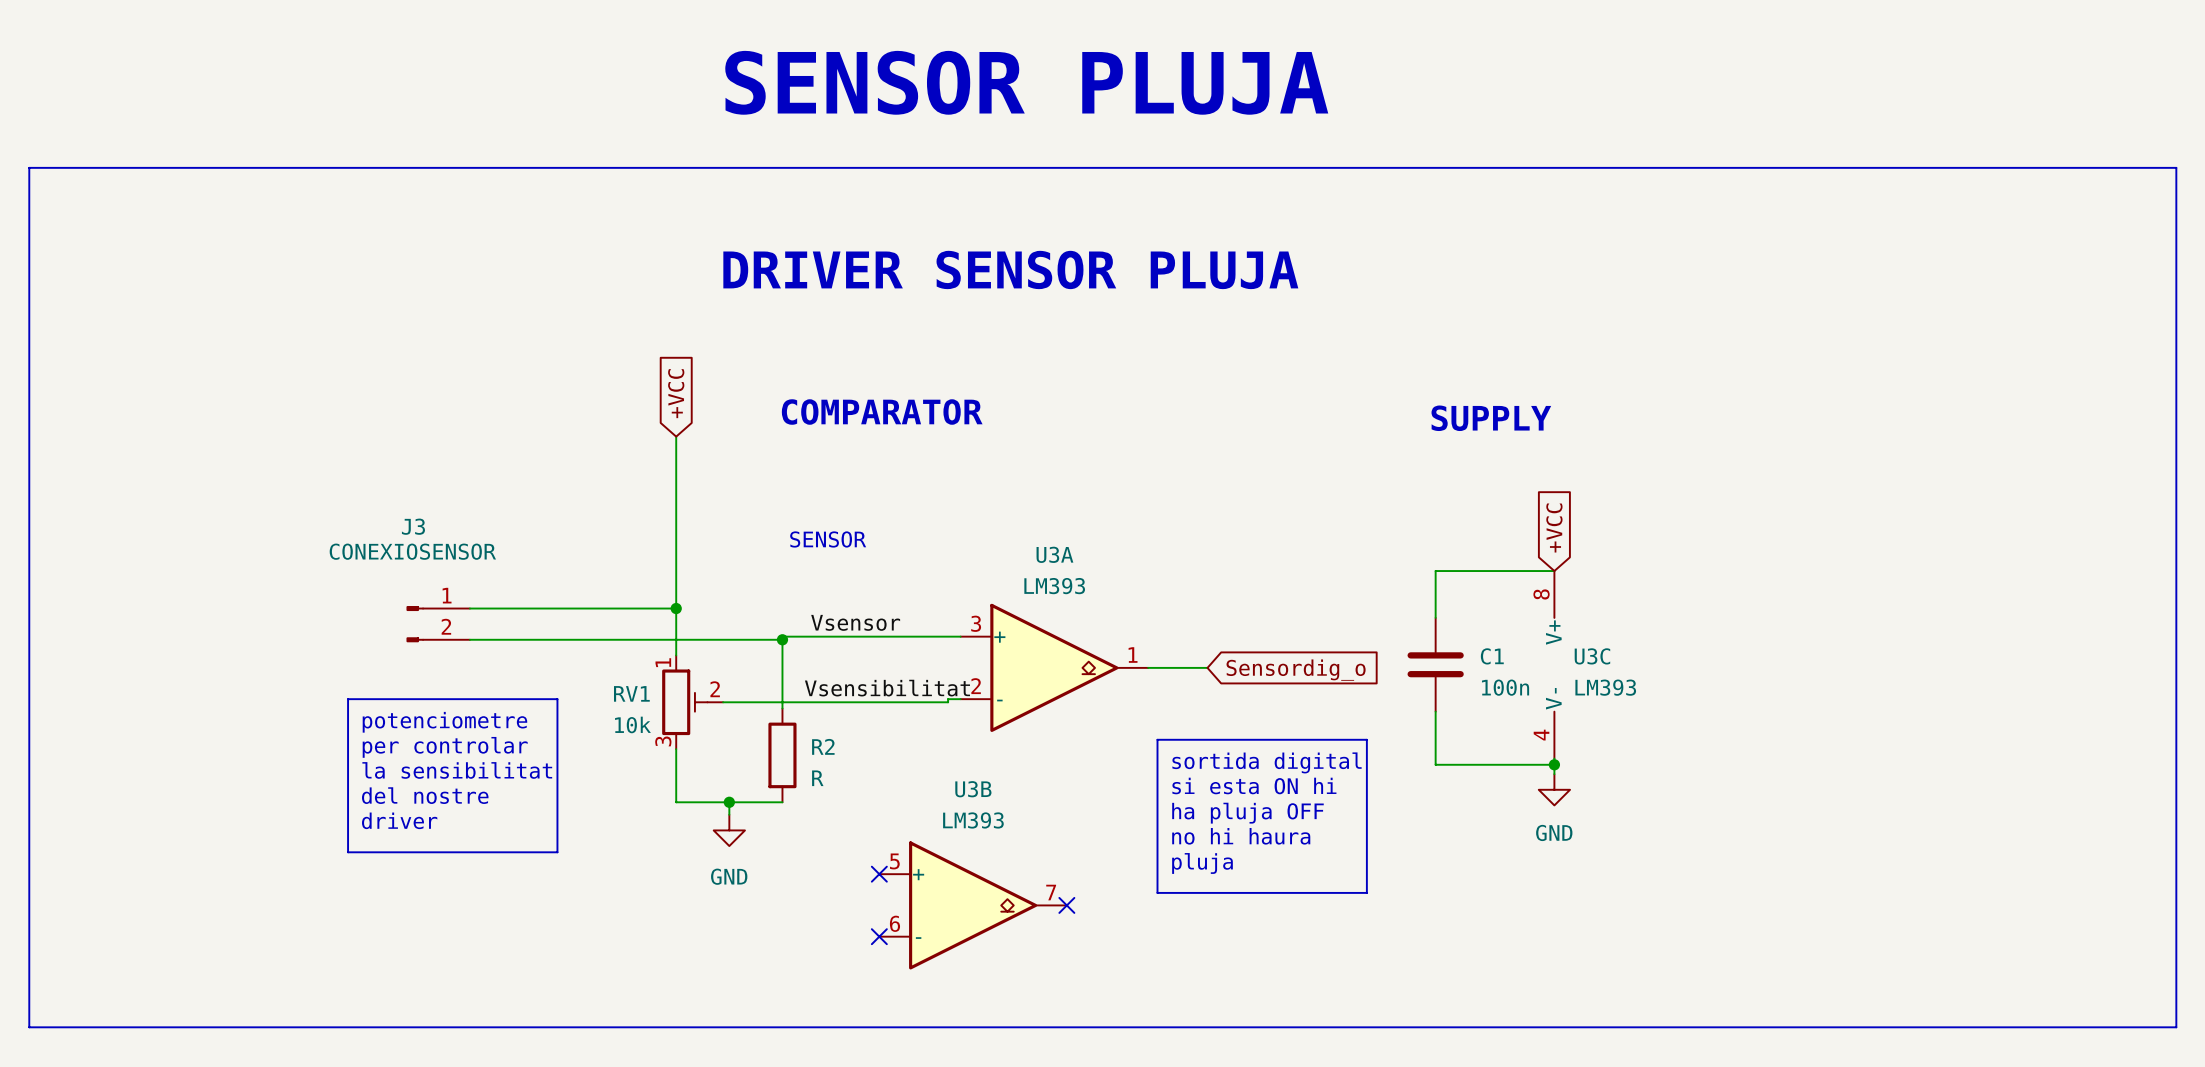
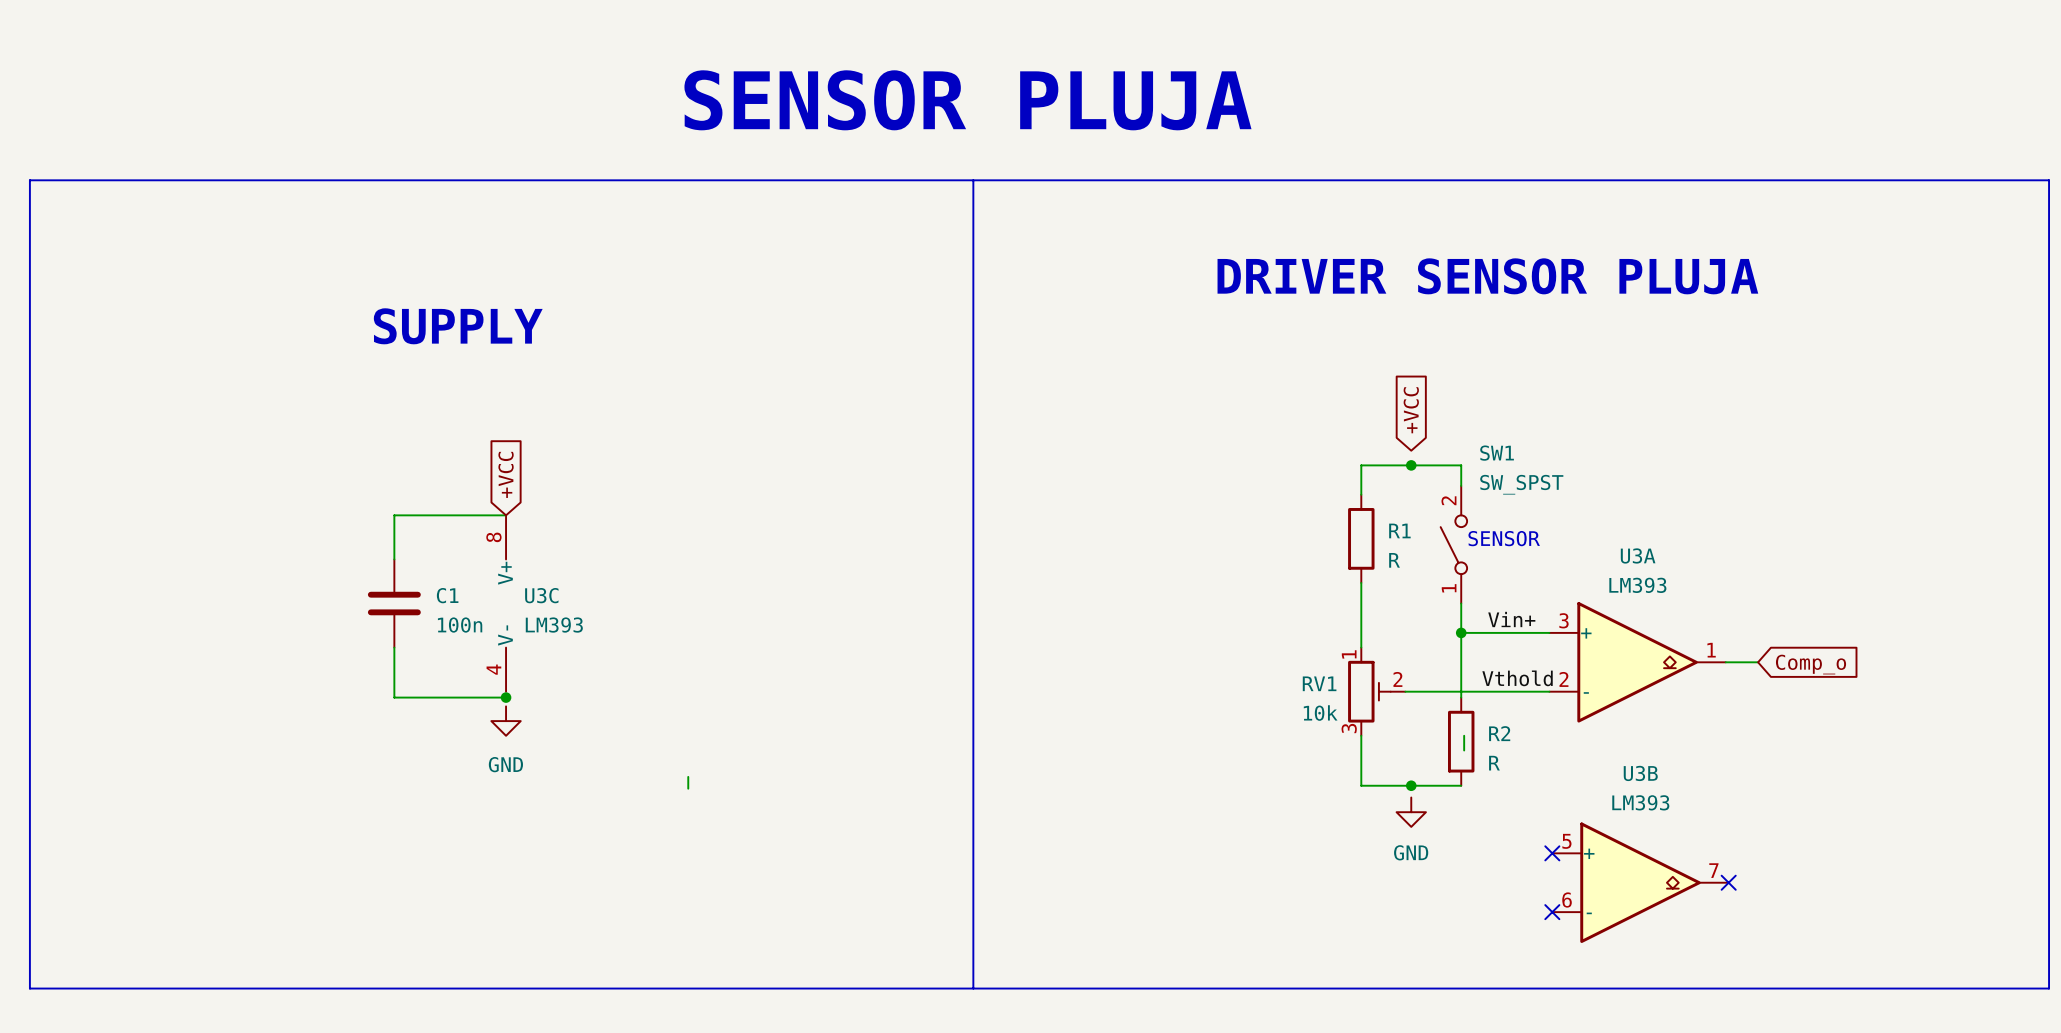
line: none -> (973, 180) (973, 988)
text: DRIVER SENSOR PLUJA (1010, 269) -> none
text: none -> DRIVER SENSOR PLUJA (1487, 276)
text: none -> SUPPLY (458, 326)
global label position: +VCC (676, 393) -> +VCC (506, 474)
text: COMPARATOR (882, 412) -> none
text: SUPPLY (1491, 418) -> none
wire: (676, 436) (676, 655) -> none
junction: none -> (1411, 465)
wire: none -> (1461, 485) (1461, 465) (1361, 465) (1361, 494)
wire: none -> (506, 515) (394, 515) (394, 559)
global label position: +VCC (1554, 528) -> +VCC (1411, 410)
text: SENSOR (828, 539) -> none
text: none -> SENSOR (1504, 538)
R1: none -> R (1361, 538)
SW1: none -> SW_SPST (1453, 544)
wire: (1554, 571) (1435, 571) (1435, 617) -> none
wire: none -> (1361, 582) (1361, 647)
wire: (469, 608) (676, 608) -> none
junction: (676, 608) -> none
wire: none -> (1461, 603) (1461, 697)
label: Vsensor (855, 622) -> none
J3: CONEXIOSENSOR (438, 624) -> none
label: none -> Vin+ (1511, 619)
wire: (960, 636) (782, 636) (782, 708) -> none
wire: (469, 639) (782, 639) -> none
junction: (782, 639) -> none
wire: none -> (1461, 632) (1549, 632)
junction: none -> (1461, 632)
wire: none -> (394, 647) (394, 697) (506, 697)
C1 position: (1435, 664) -> (394, 603)
U3C position: (1554, 664) -> (506, 603)
U3A position: (1054, 667) -> (1637, 662)
wire: (1148, 667) (1207, 667) -> none
global label: Sensordig_o (1296, 670) -> none
wire: none -> (1725, 662) (1758, 662)
global label: none -> Comp_o (1811, 664)
label: Vsensibilitat (887, 688) -> none
label: none -> Vthold (1517, 678)
line: (348, 699) (557, 699) (557, 852) (348, 852) (348, 699) -> none
wire: (960, 699) (948, 699) (948, 702) (723, 702) -> none
RV1 position: (692, 702) -> (1376, 691)
wire: (1435, 711) (1435, 764) (1554, 764) -> none
wire: none -> (1405, 691) (1549, 691)
junction: none -> (506, 697)
text: potenciometre (444, 722) -> none
line: (1157, 739) (1366, 739) (1366, 892) (1157, 892) (1157, 739) -> none
text: per controlar (445, 747) -> none
wire: (676, 749) (676, 802) (782, 802) -> none
R2 position: (782, 755) -> (1461, 741)
wire: none -> (1361, 735) (1361, 785) (1461, 785)
text: sortida digital (1267, 762) -> none
junction: (1554, 764) -> none
text: la sensibilitat (457, 770) -> none
text: si esta ON hi (1254, 785) -> none
power symbol position: GND (1554, 789) -> GND (1411, 812)
text: del nostre (425, 795) -> none
junction: (729, 802) -> none
junction: none -> (1411, 785)
text: ha pluja OFF (1247, 813) -> none
text: driver (399, 820) -> none
power symbol position: GND (729, 830) -> GND (506, 721)
text: no hi haura (1241, 836) -> none
text: pluja (1202, 863) -> none
no-connect mark: (879, 874) -> none
no-connect mark: none -> (1552, 853)
U3B position: (973, 905) -> (1640, 882)
no-connect mark: (1066, 905) -> none
no-connect mark: none -> (1728, 882)
no-connect mark: (879, 936) -> none
no-connect mark: none -> (1552, 912)

